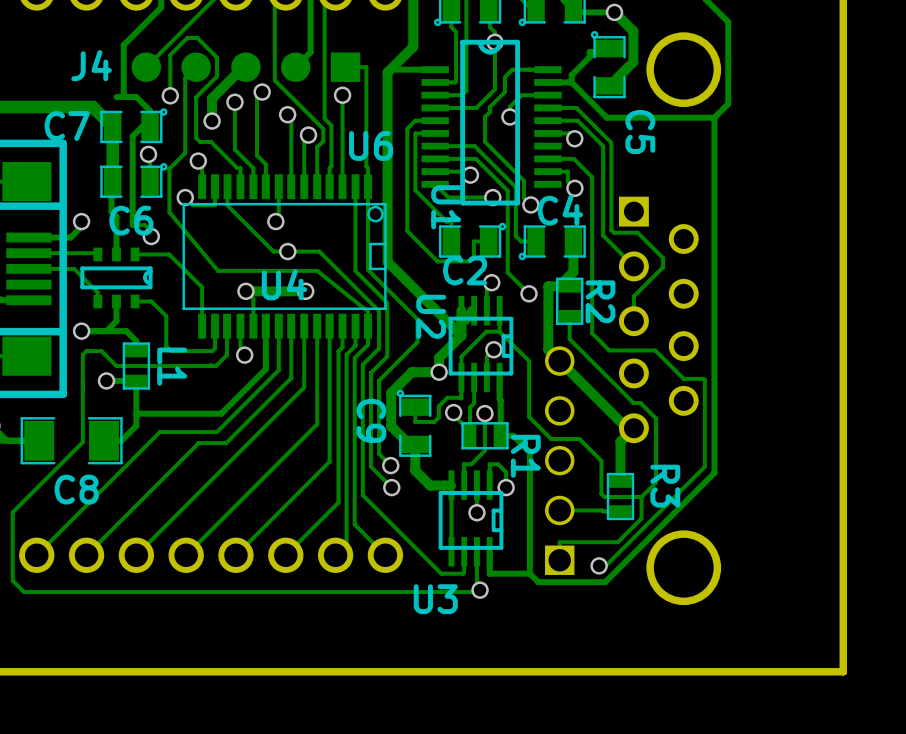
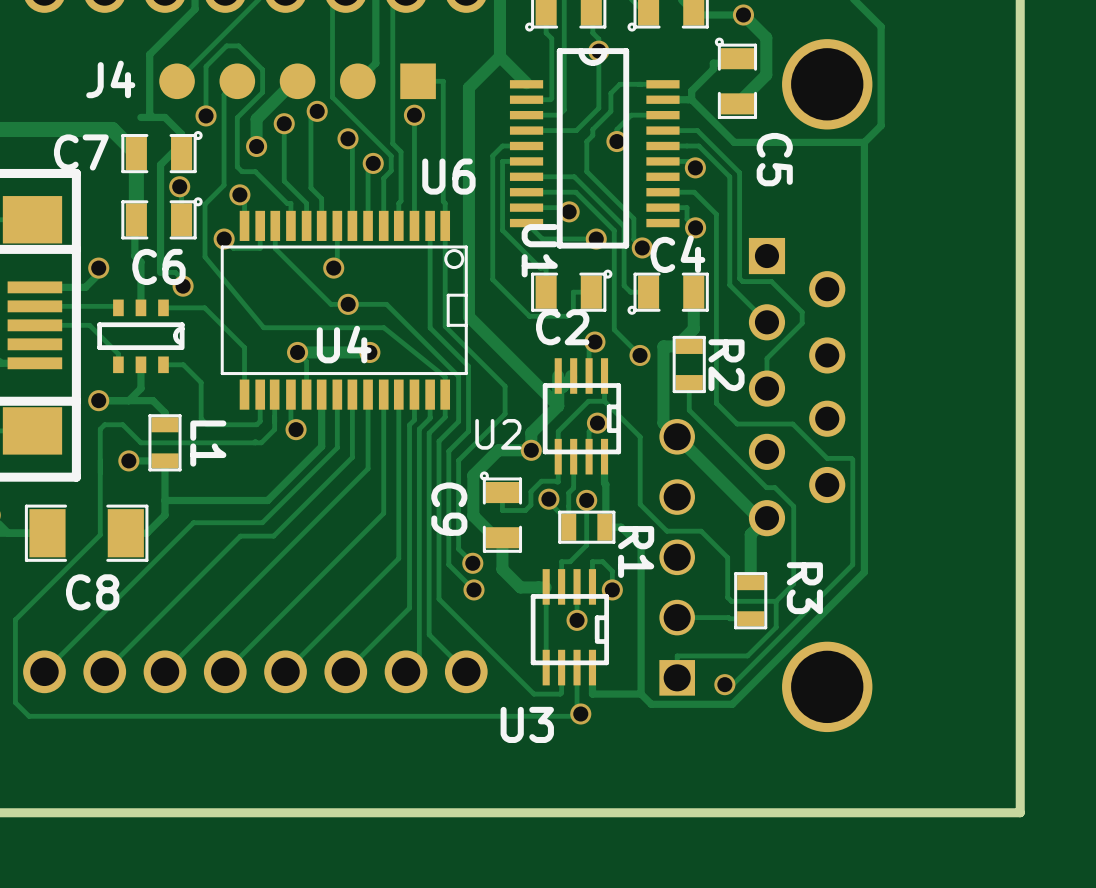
track: (435, 69) (390, 69) (387, 72) -> (526, 84) (499, 56)
U2 name rotation: 0° (431, 316) -> 90° counterclockwise (498, 434)

